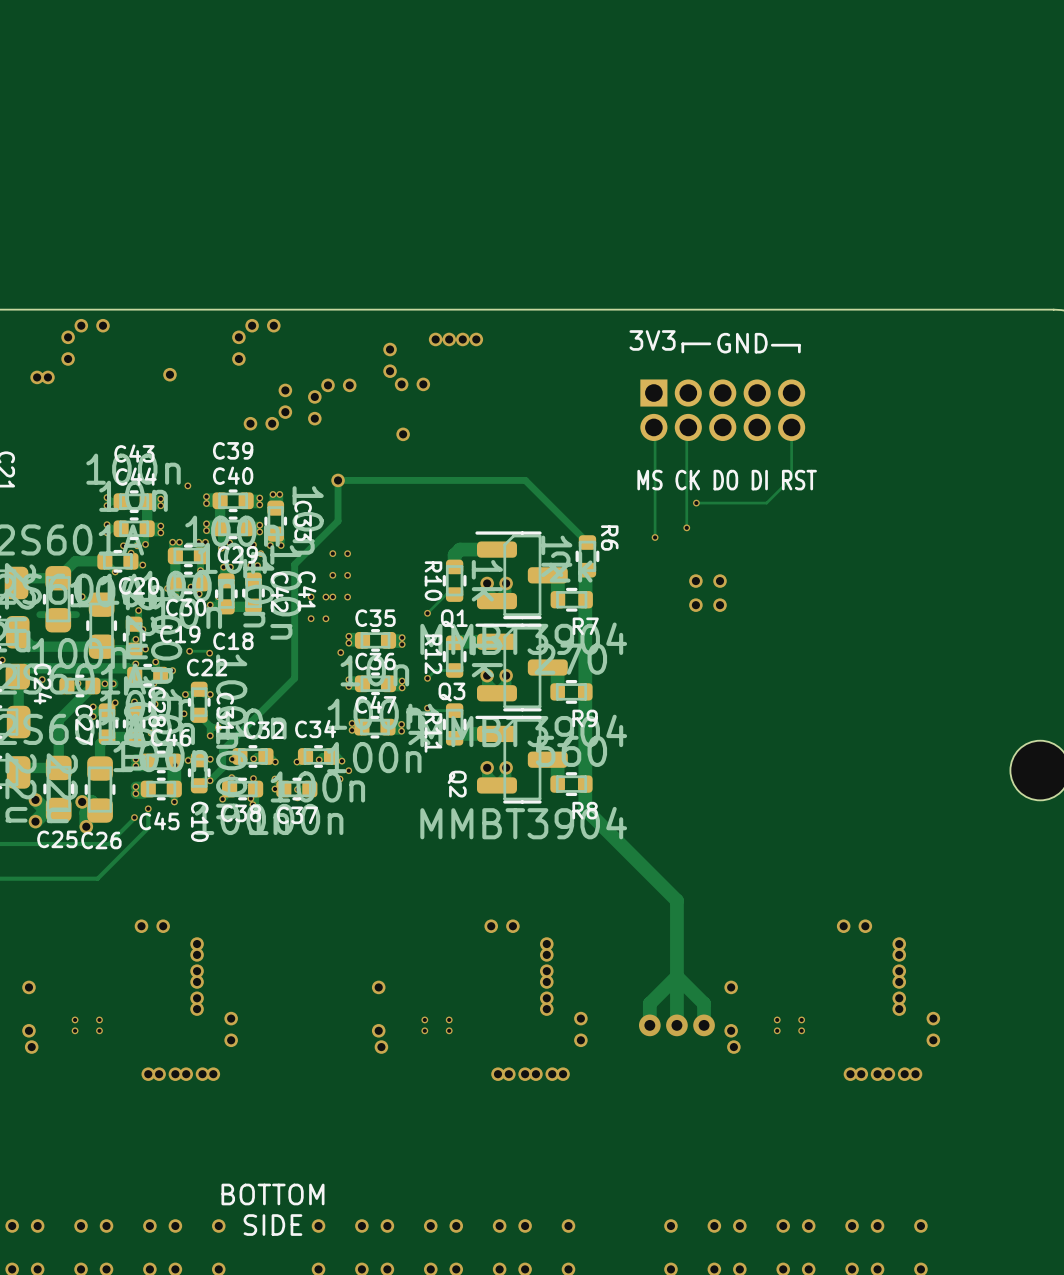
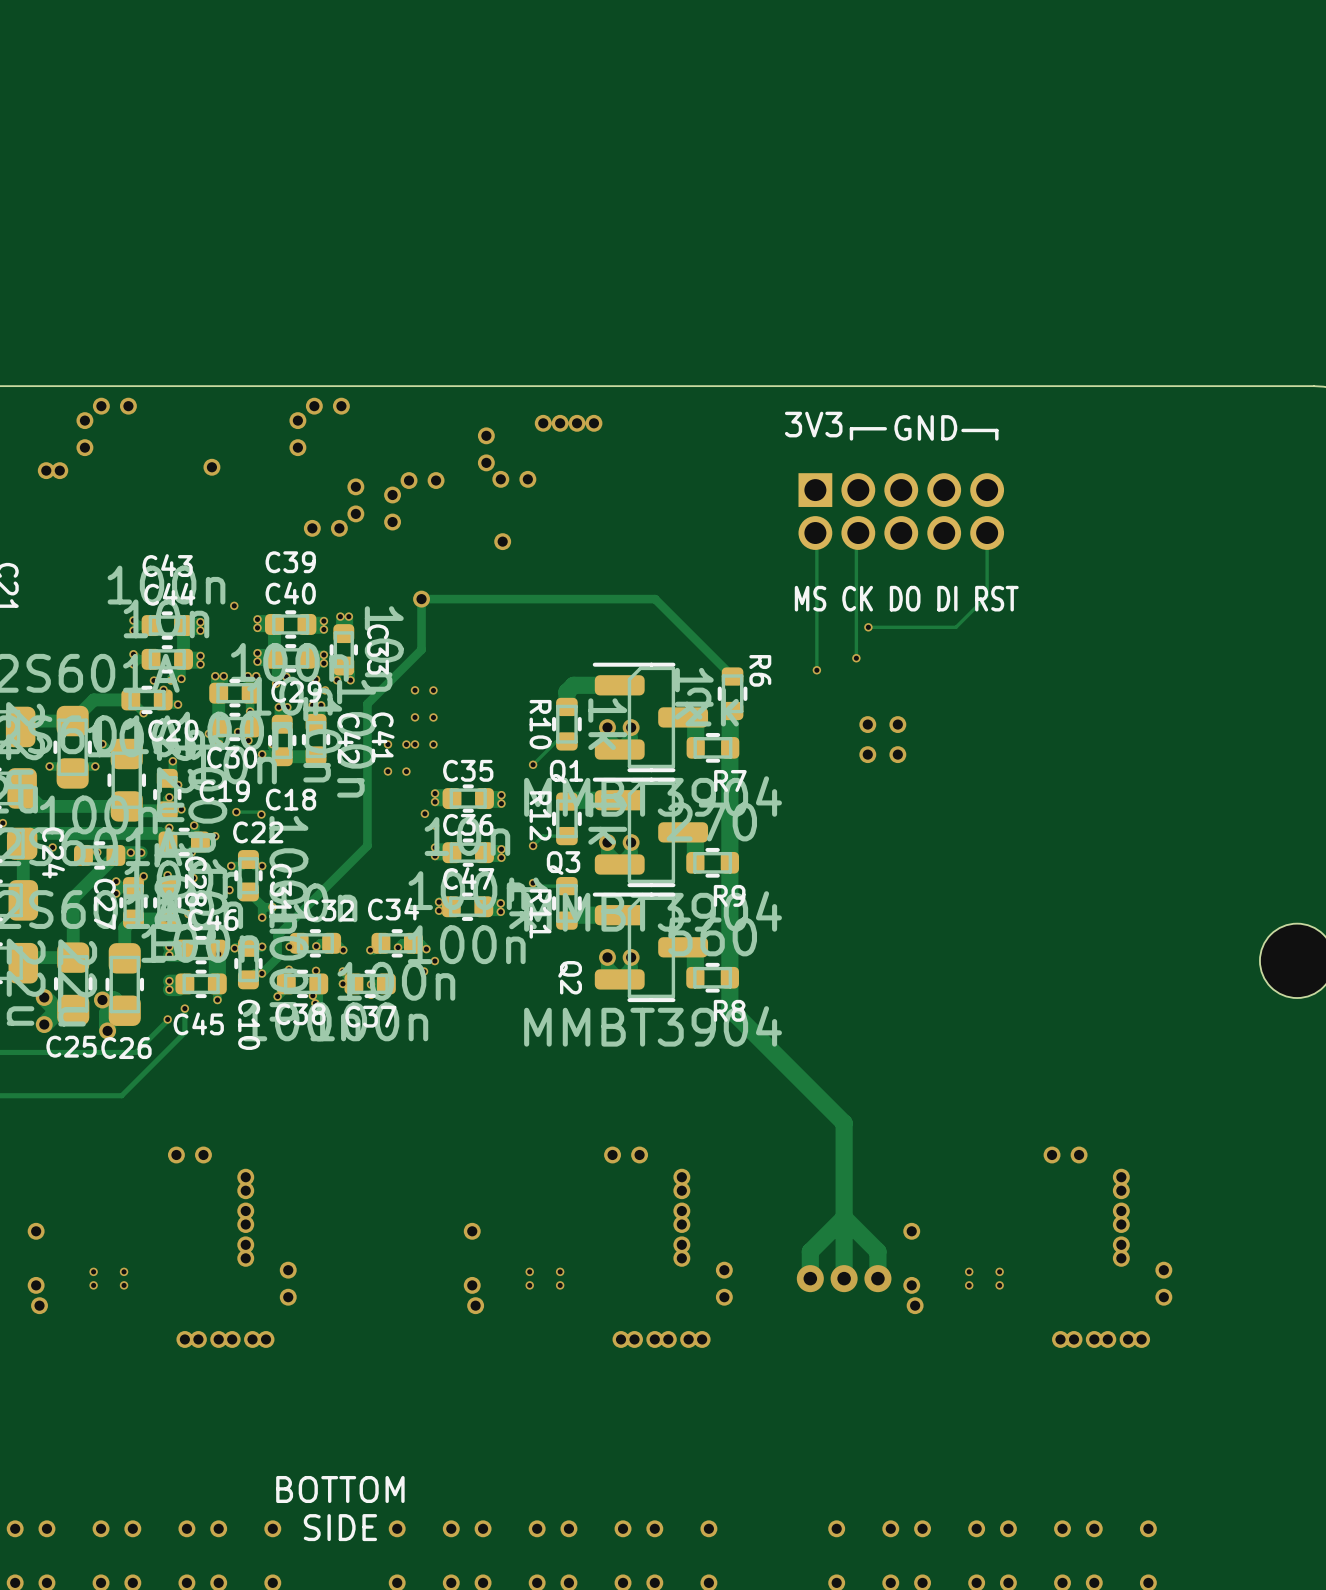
via: none -> (49, 766)
via: none -> (95, 766)

